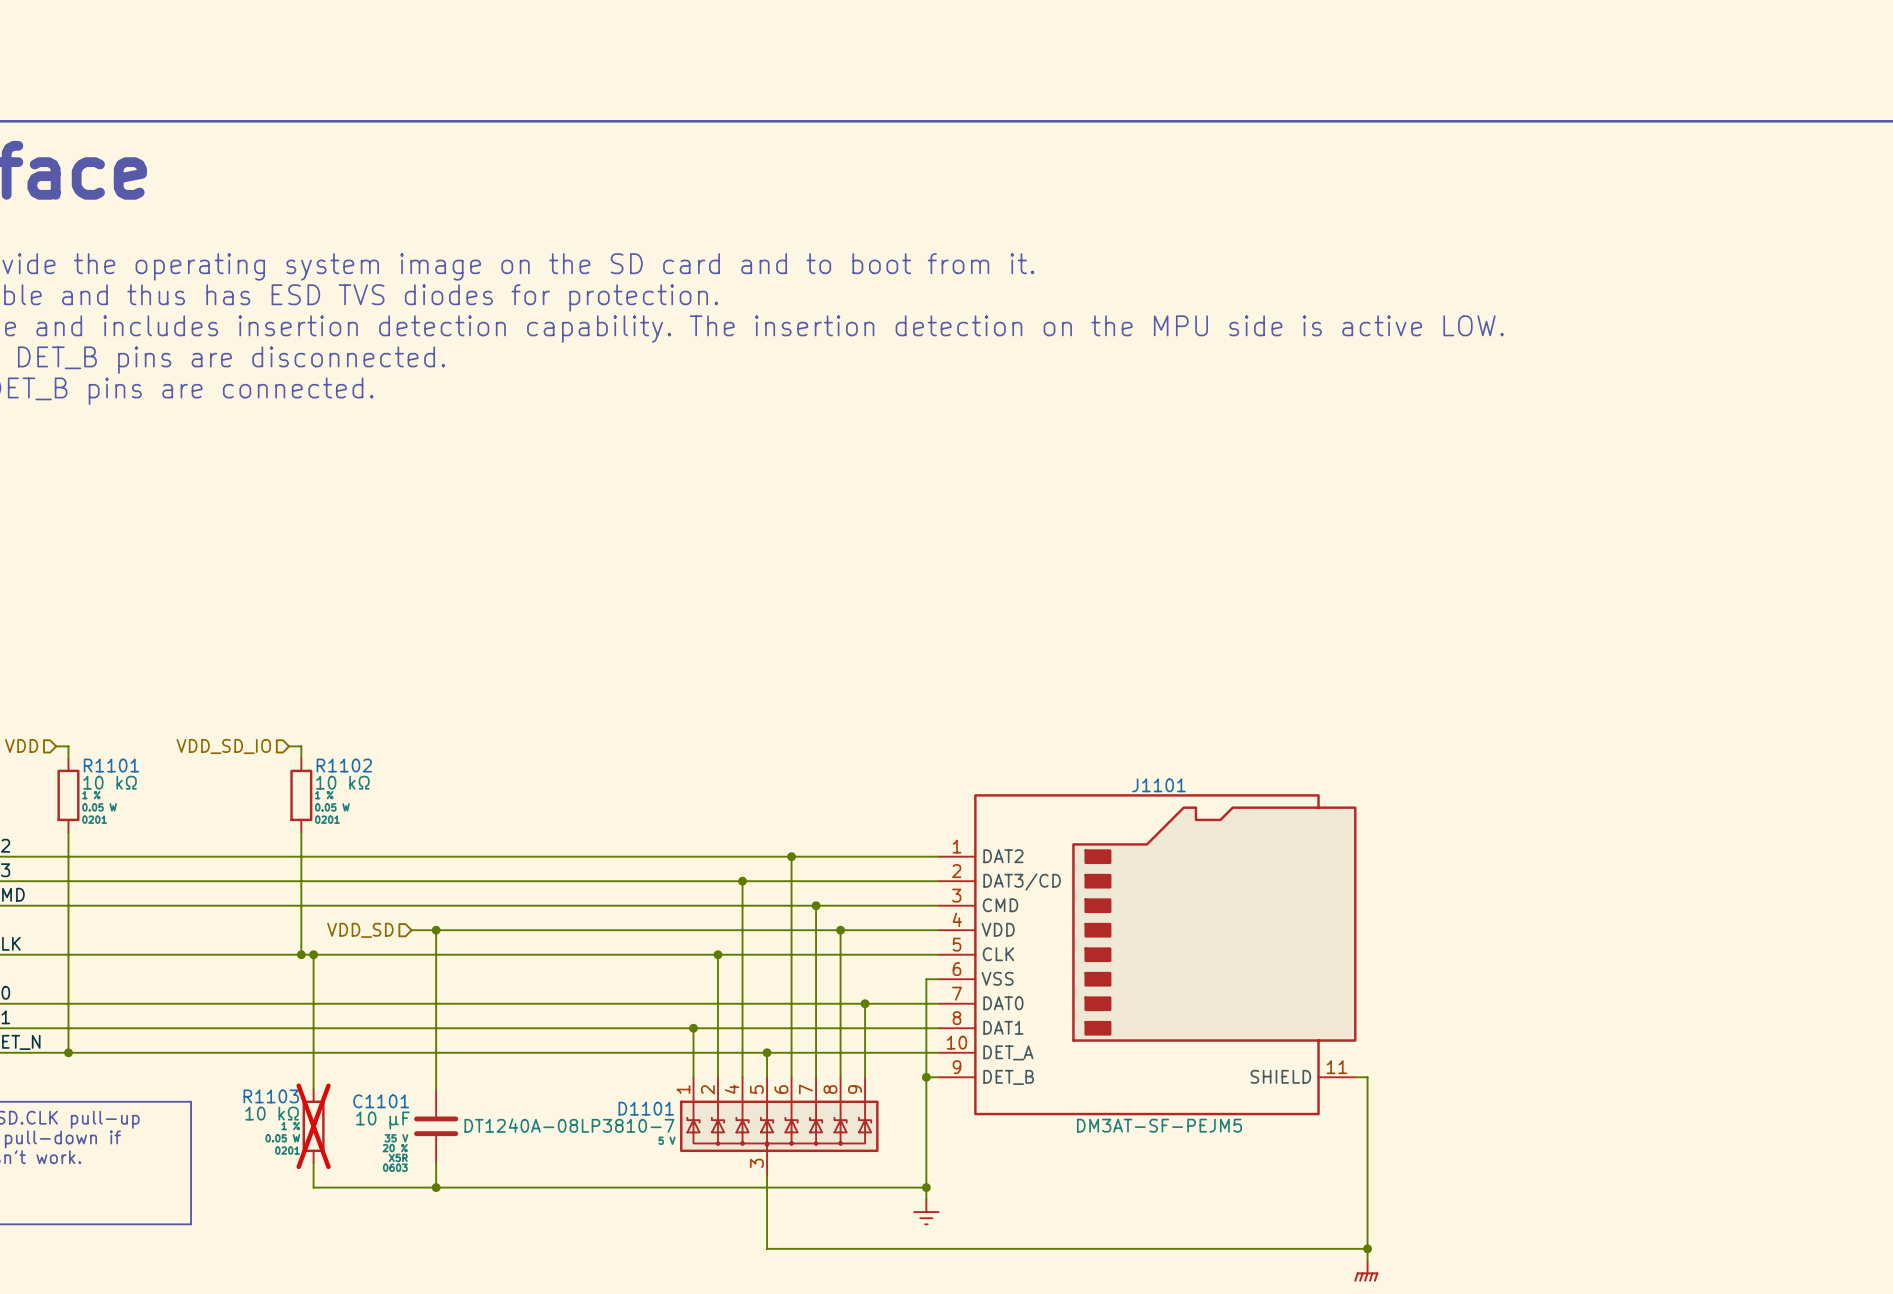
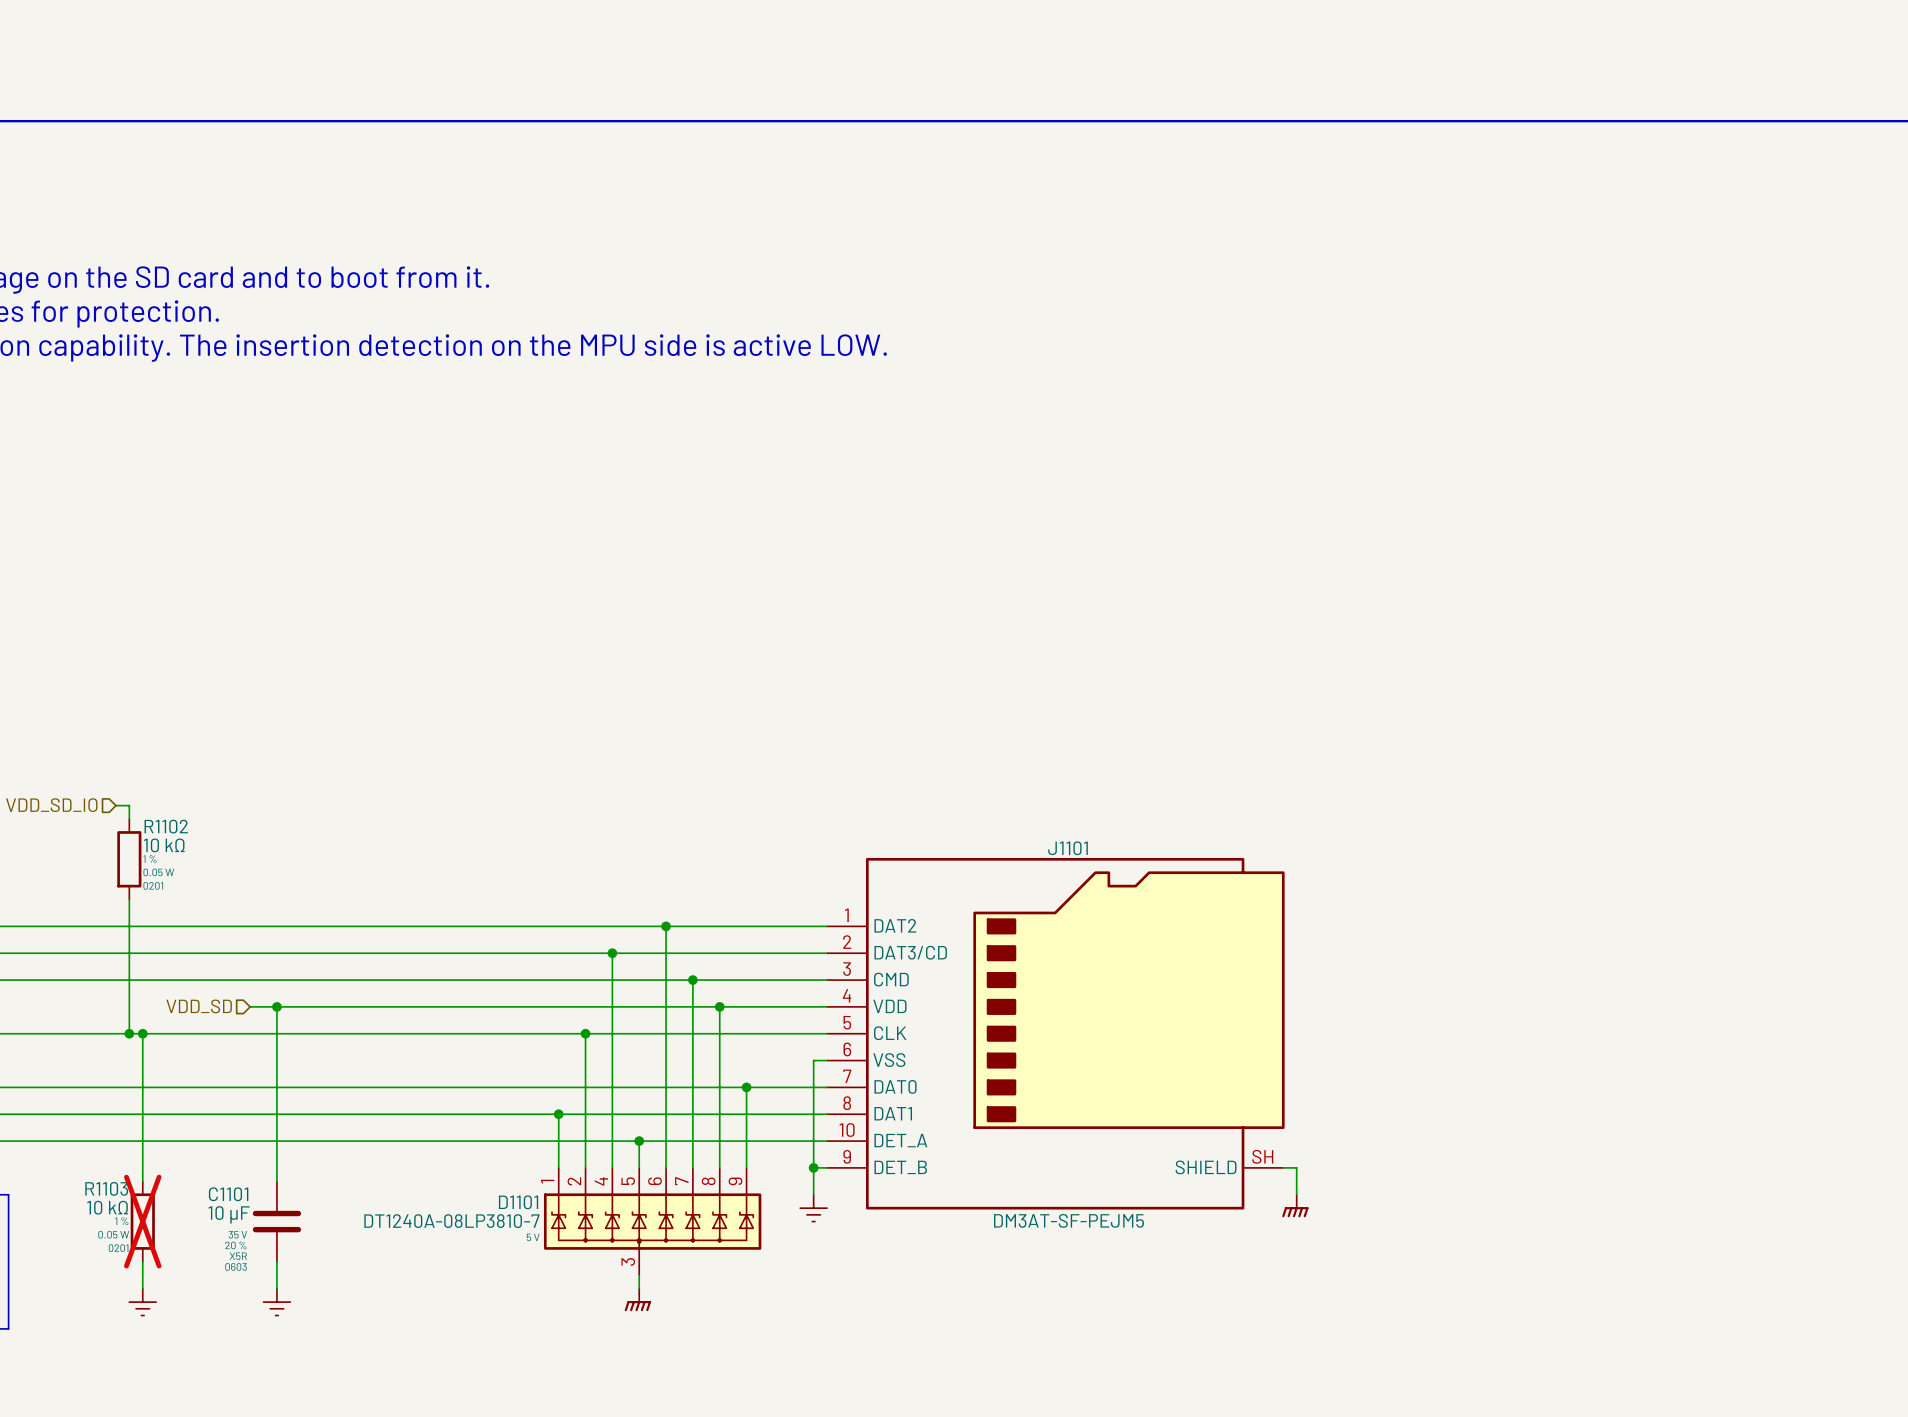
J1101 pin number: 11 (1336, 1067) -> SH (1262, 1156)
wire: (926, 1101) (926, 1199) -> none
wire: (1367, 1101) (1367, 1261) -> none
wire: (313, 1187) (926, 1187) -> none
junction: (436, 1187) -> none
wire: (767, 1187) (767, 1248) (1367, 1248) -> none
junction: (926, 1187) -> none
power symbol: none -> (637, 1299)
power symbol: none -> (142, 1302)
power symbol: none -> (276, 1302)
power symbol position: (926, 1212) -> (813, 1208)
junction: (1367, 1248) -> none
power symbol position: (1366, 1271) -> (1295, 1206)

